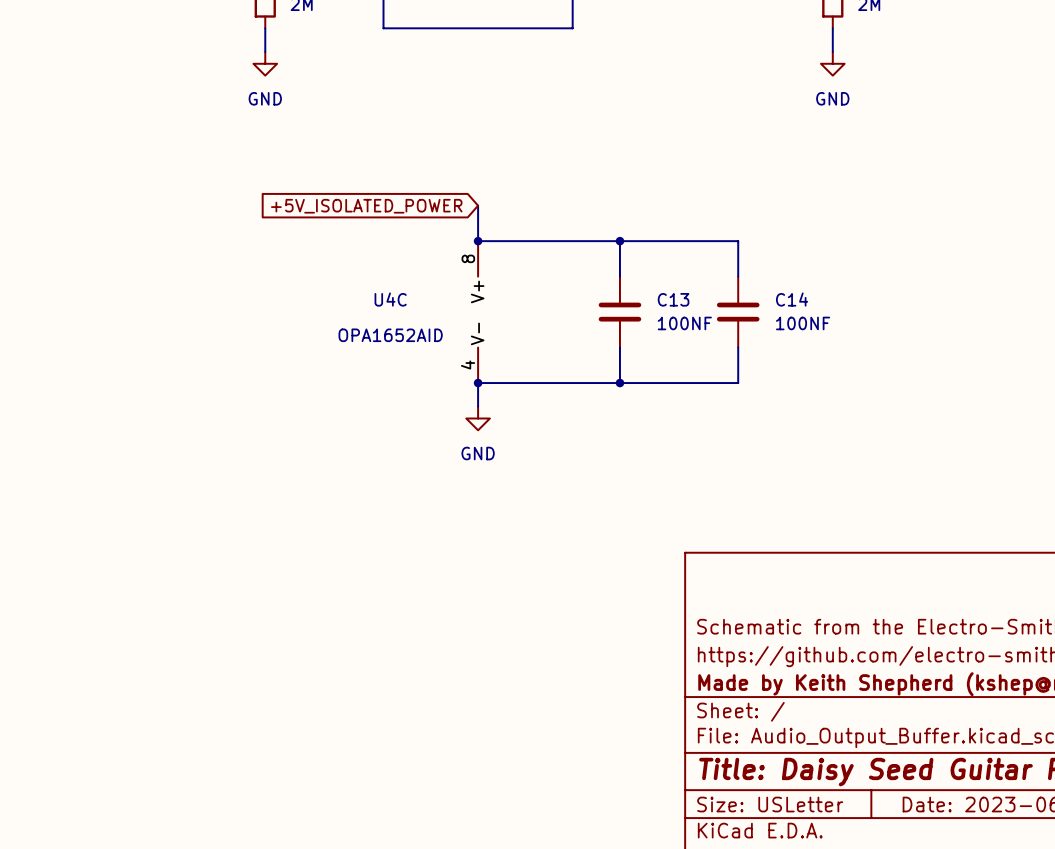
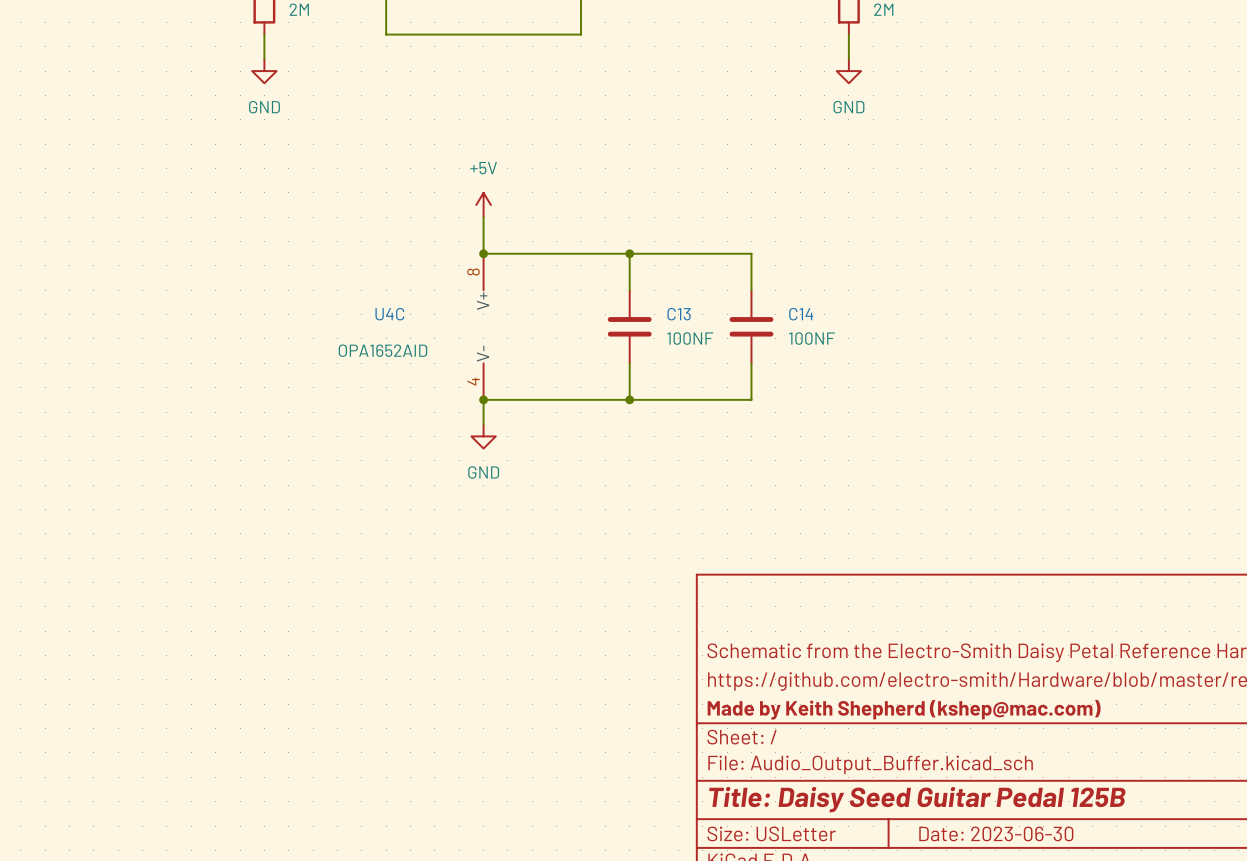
power symbol: none -> +5V (483, 205)
global label: +5V_ISOLATED_POWER (366, 206) -> none

